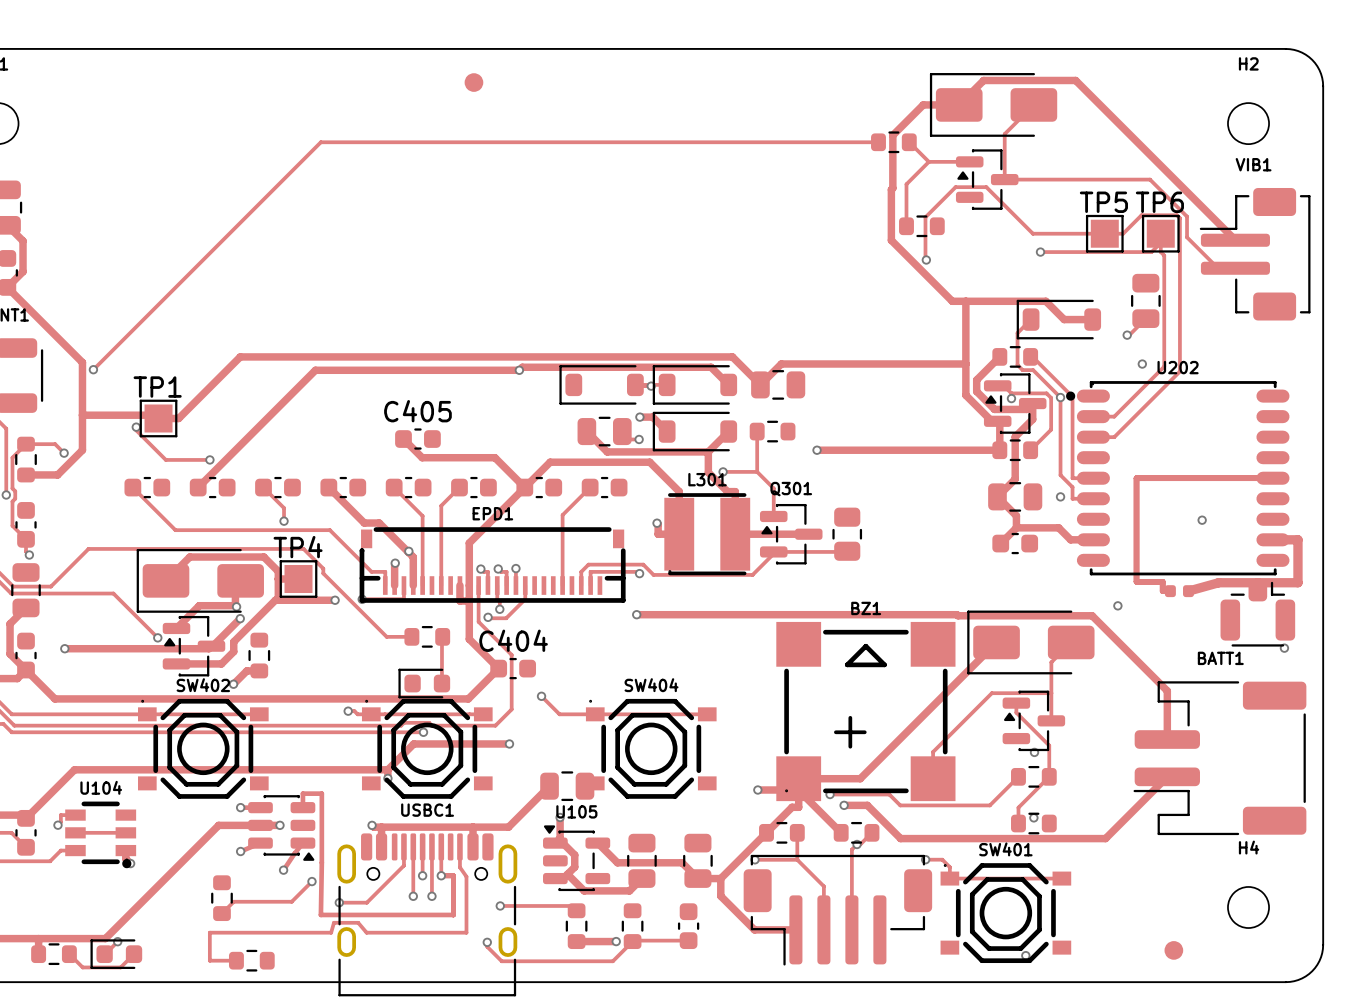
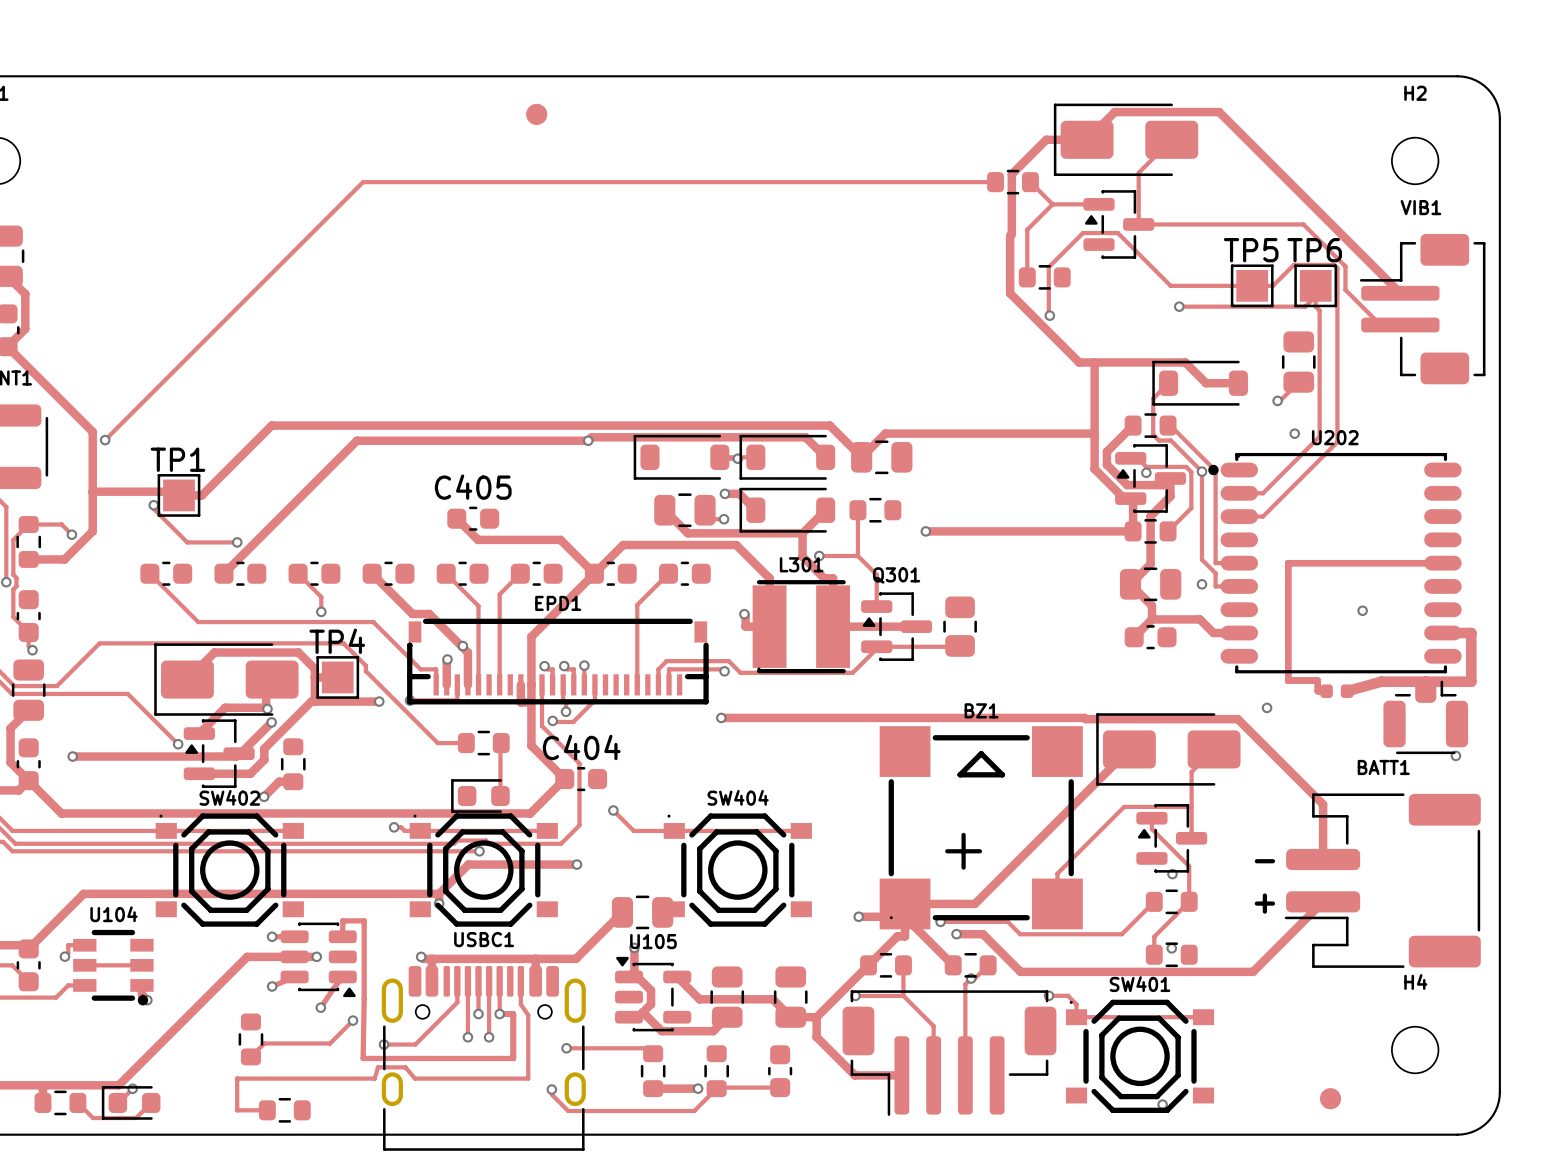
text: none -> - (1264, 861)
text: none -> + (1264, 903)

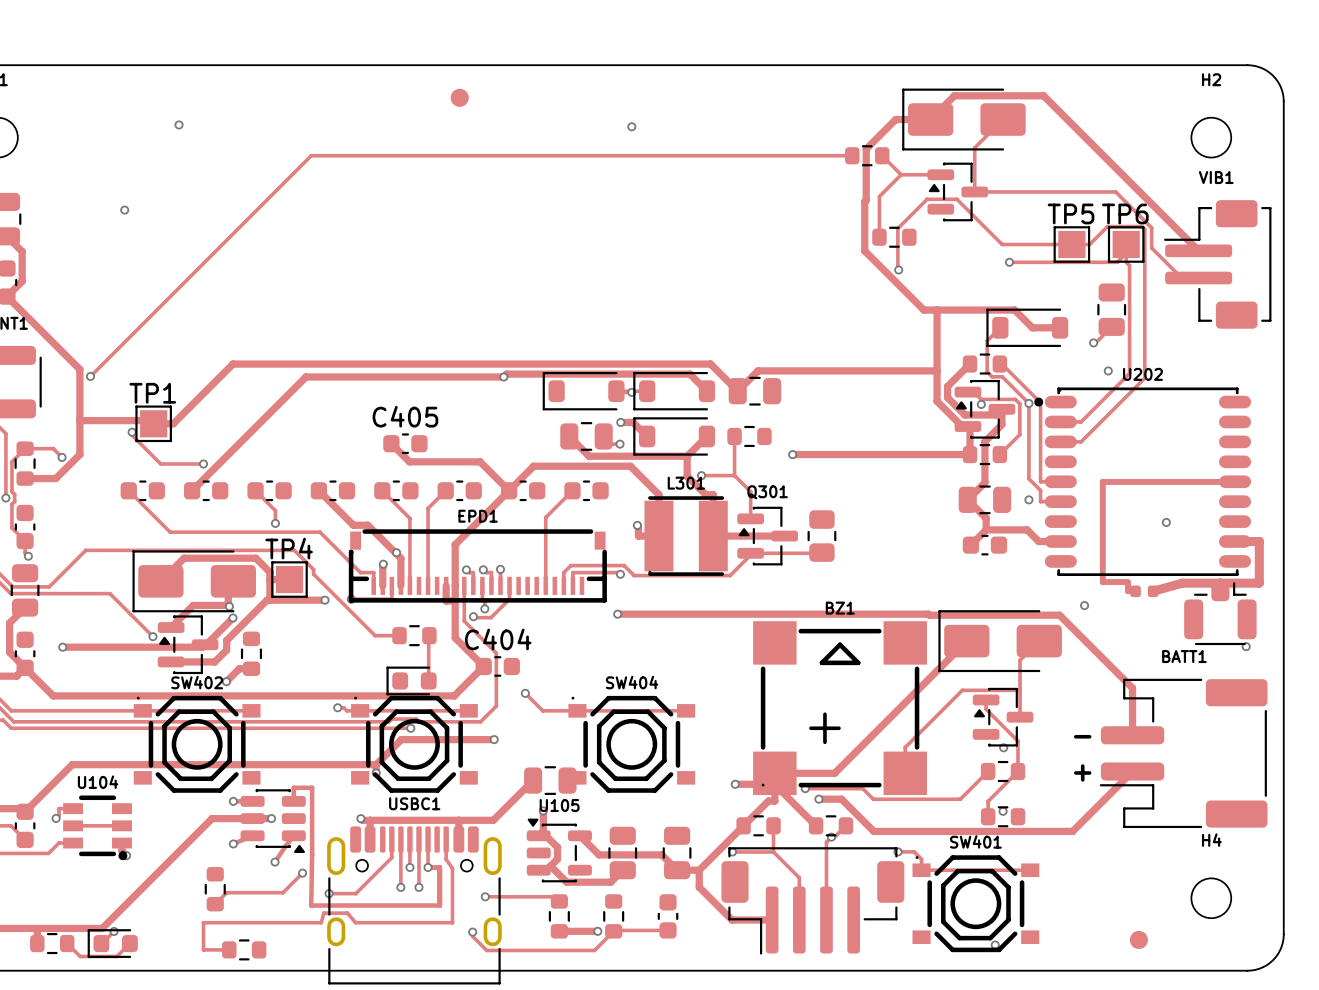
via: none -> (179, 124)
via: none -> (631, 126)
via: none -> (124, 210)

